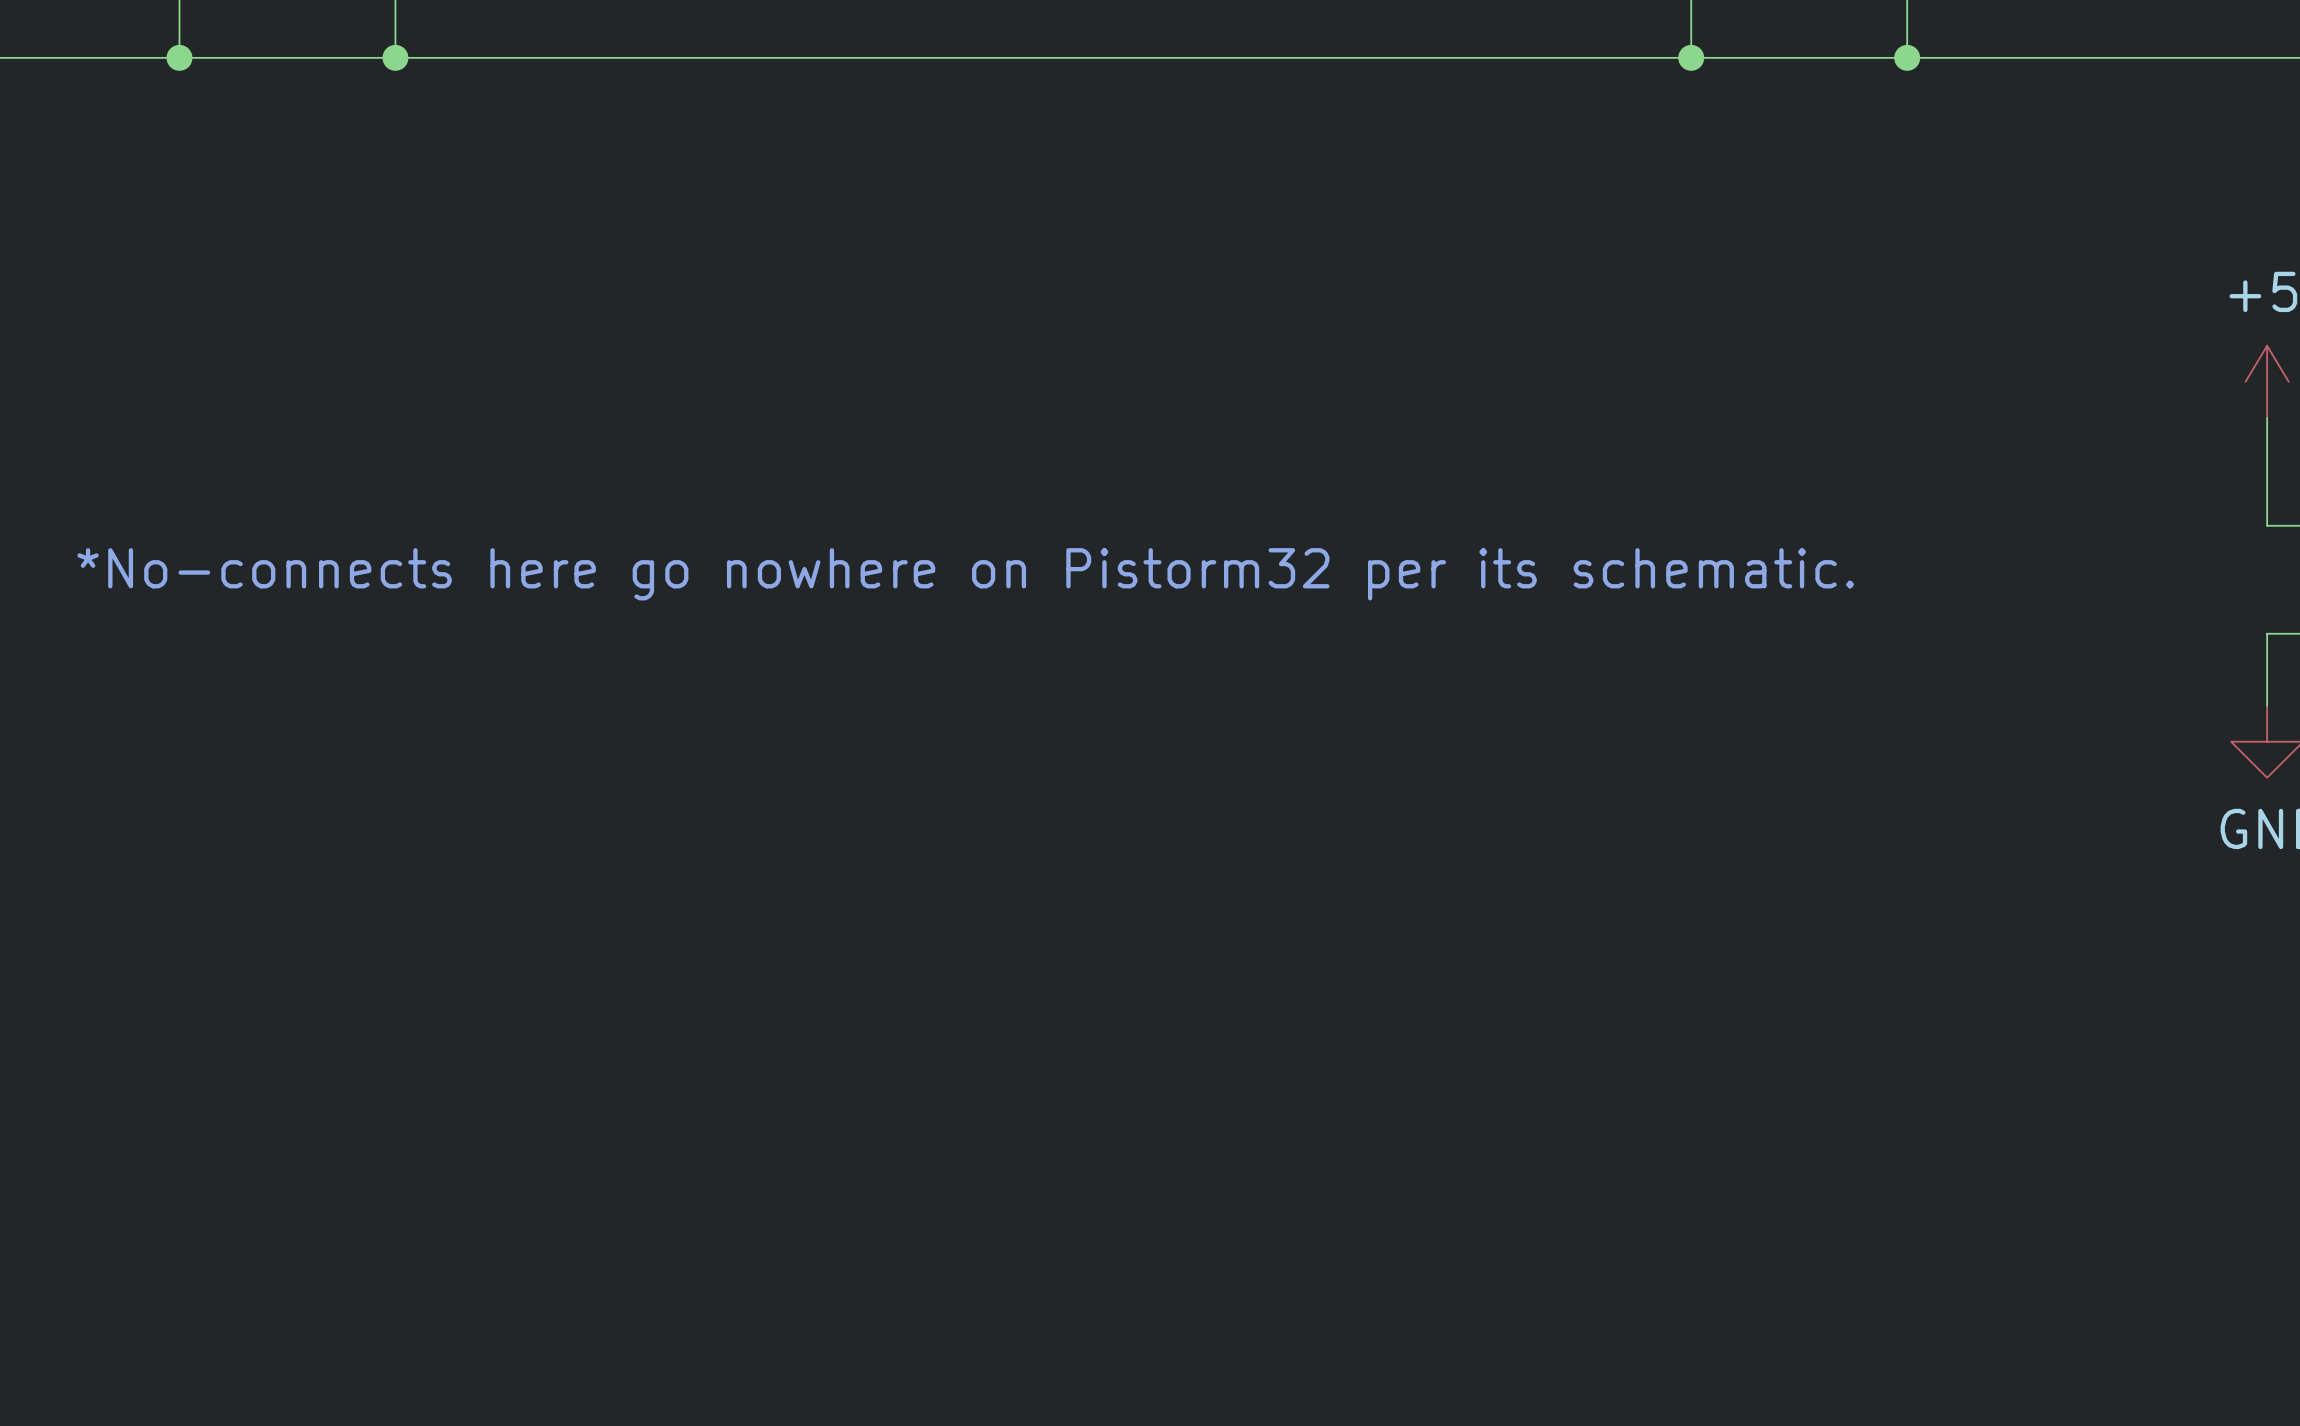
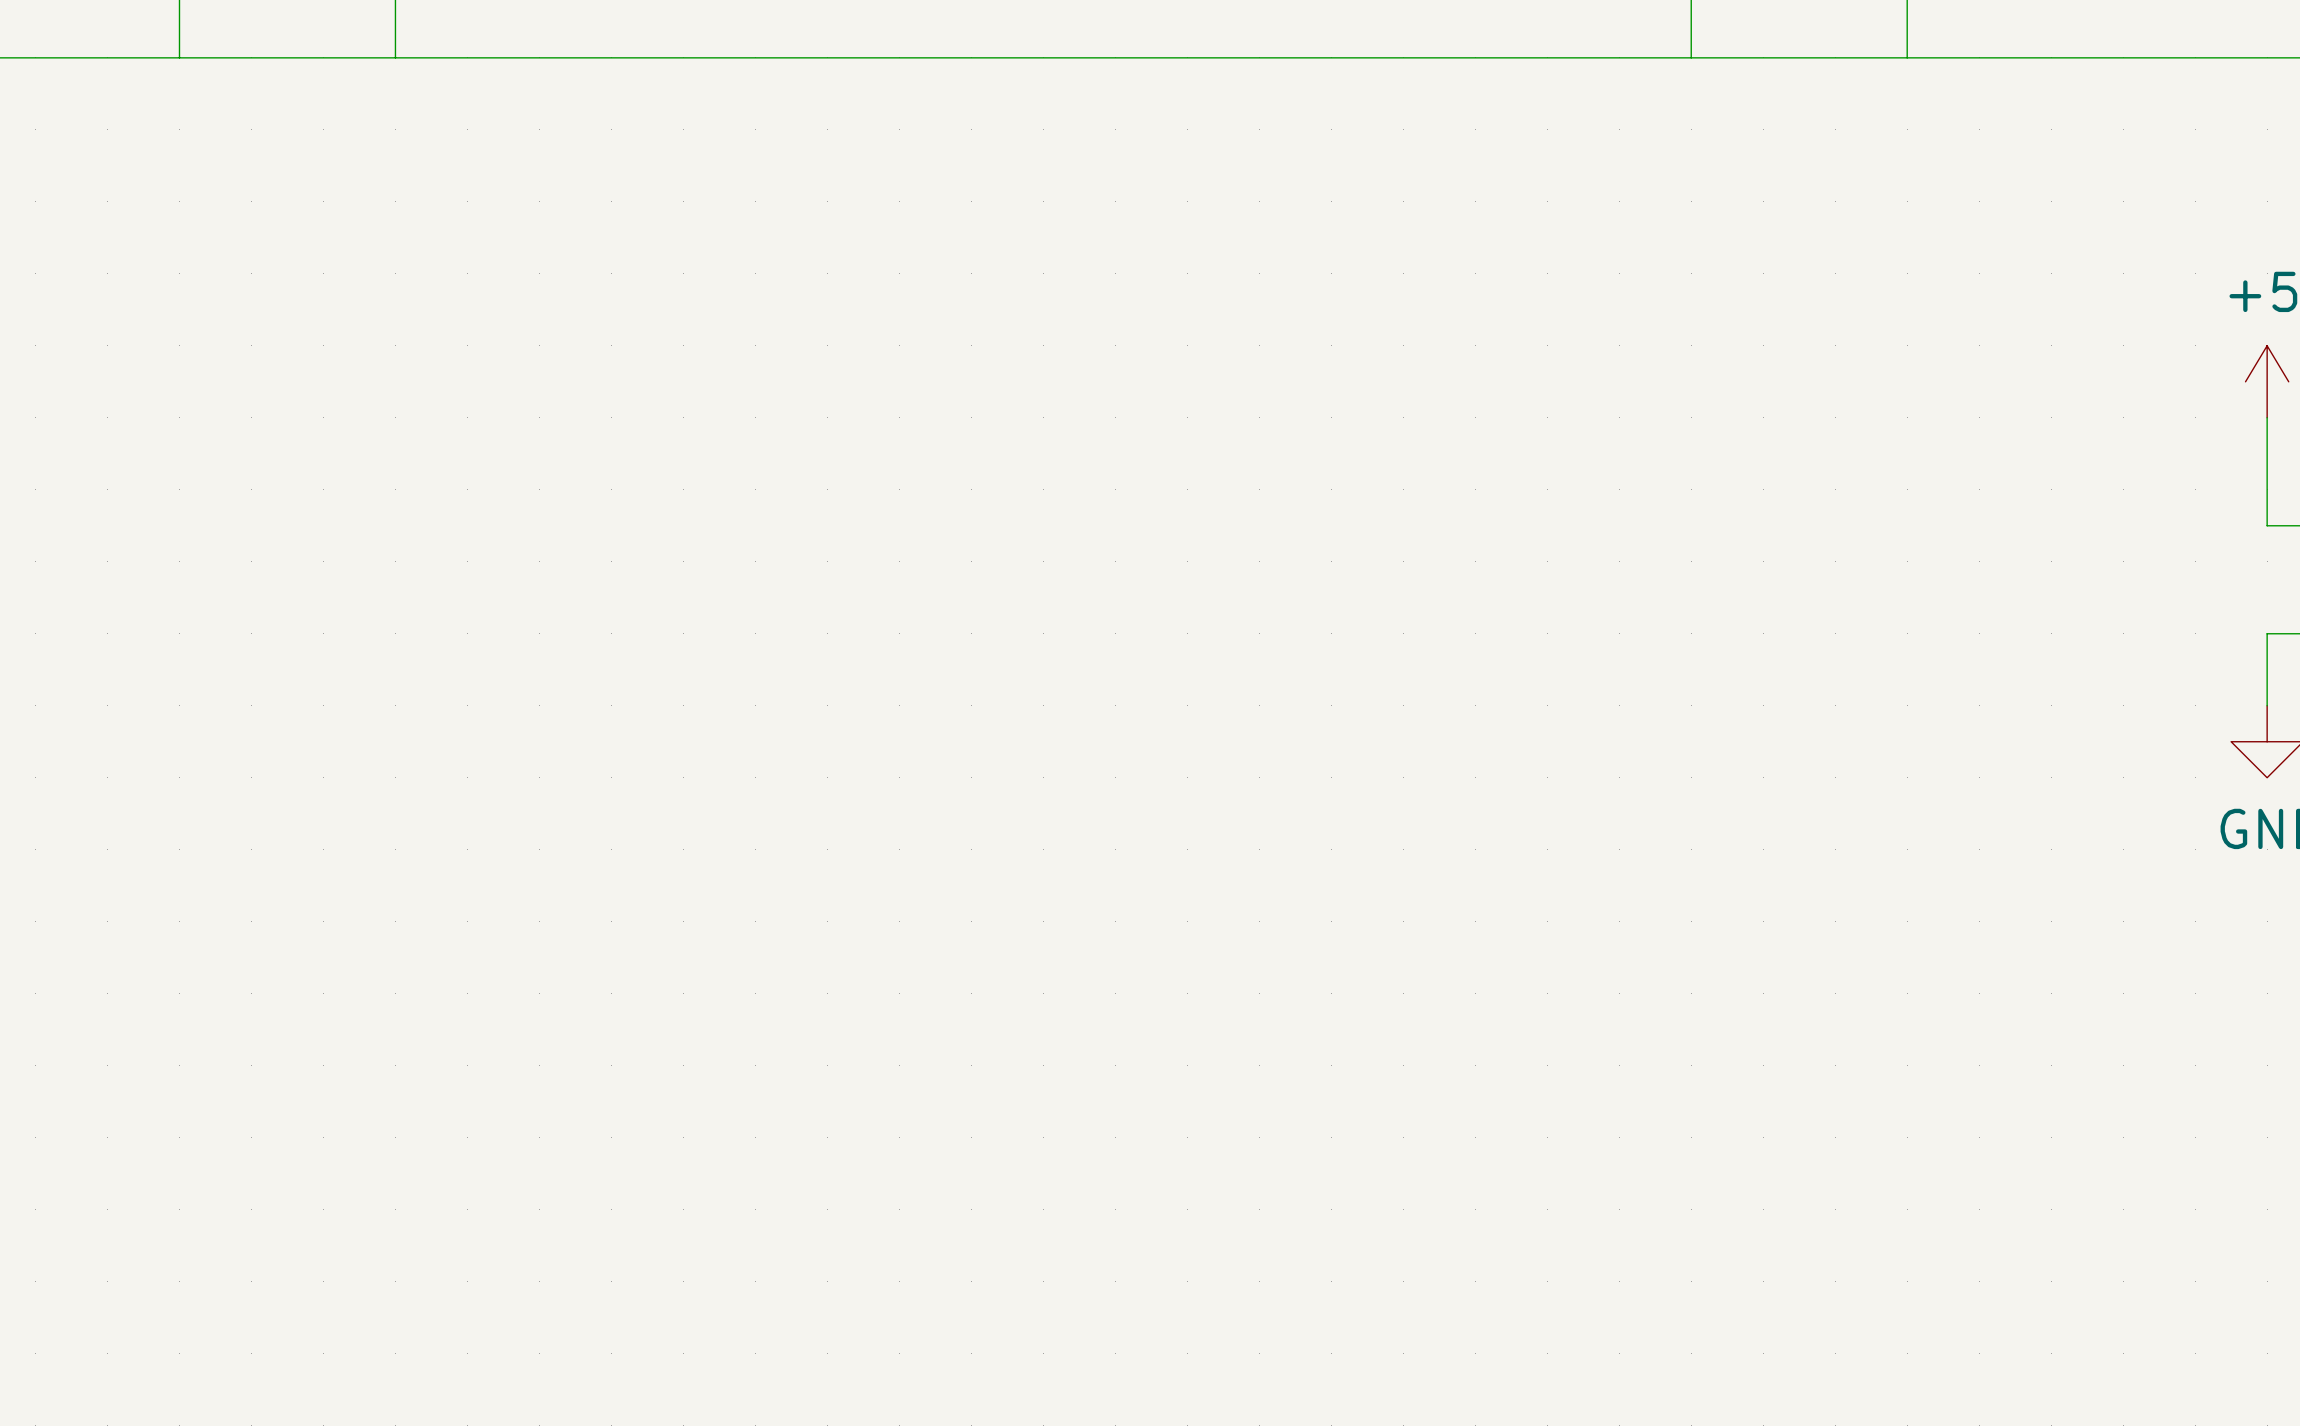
junction: (179, 57) -> none
junction: (395, 57) -> none
junction: (1691, 57) -> none
junction: (1907, 57) -> none
text: *No-connects here go nowhere on Pistorm32 per its schematic. (965, 574) -> none

